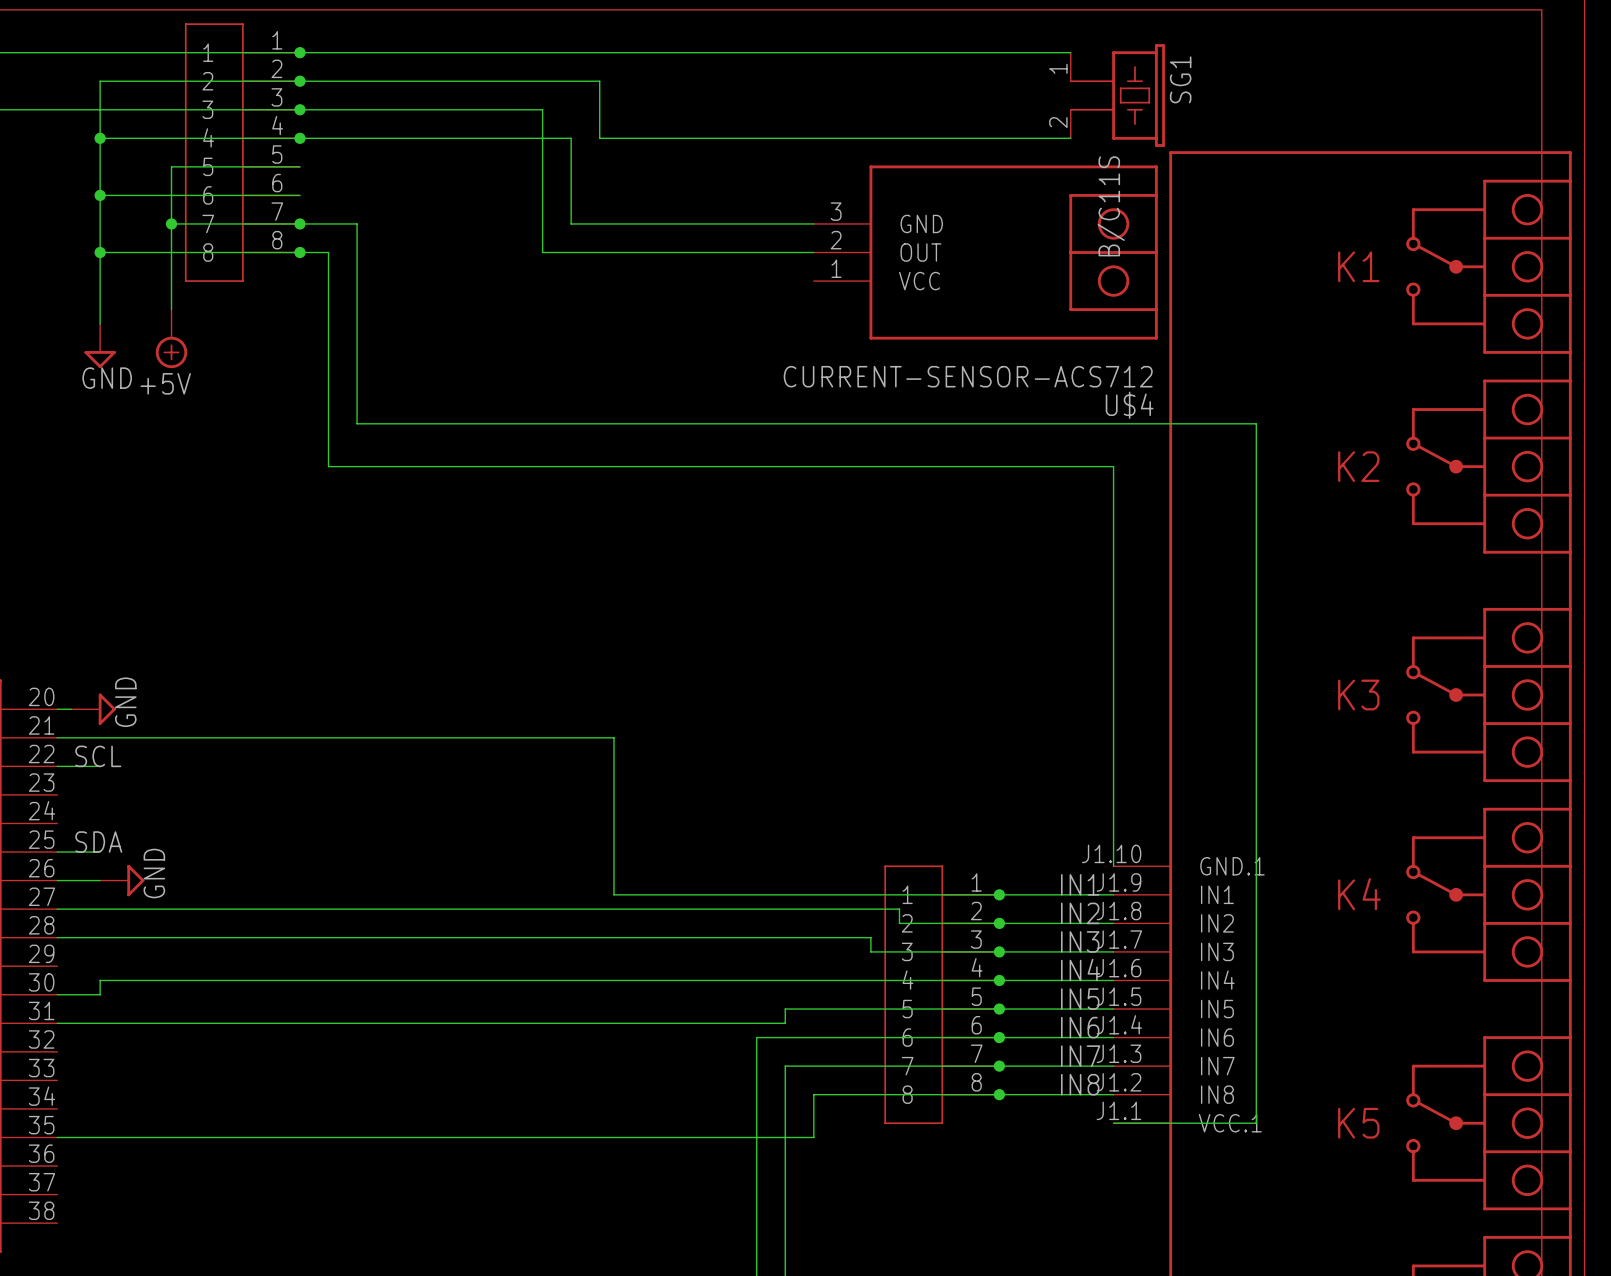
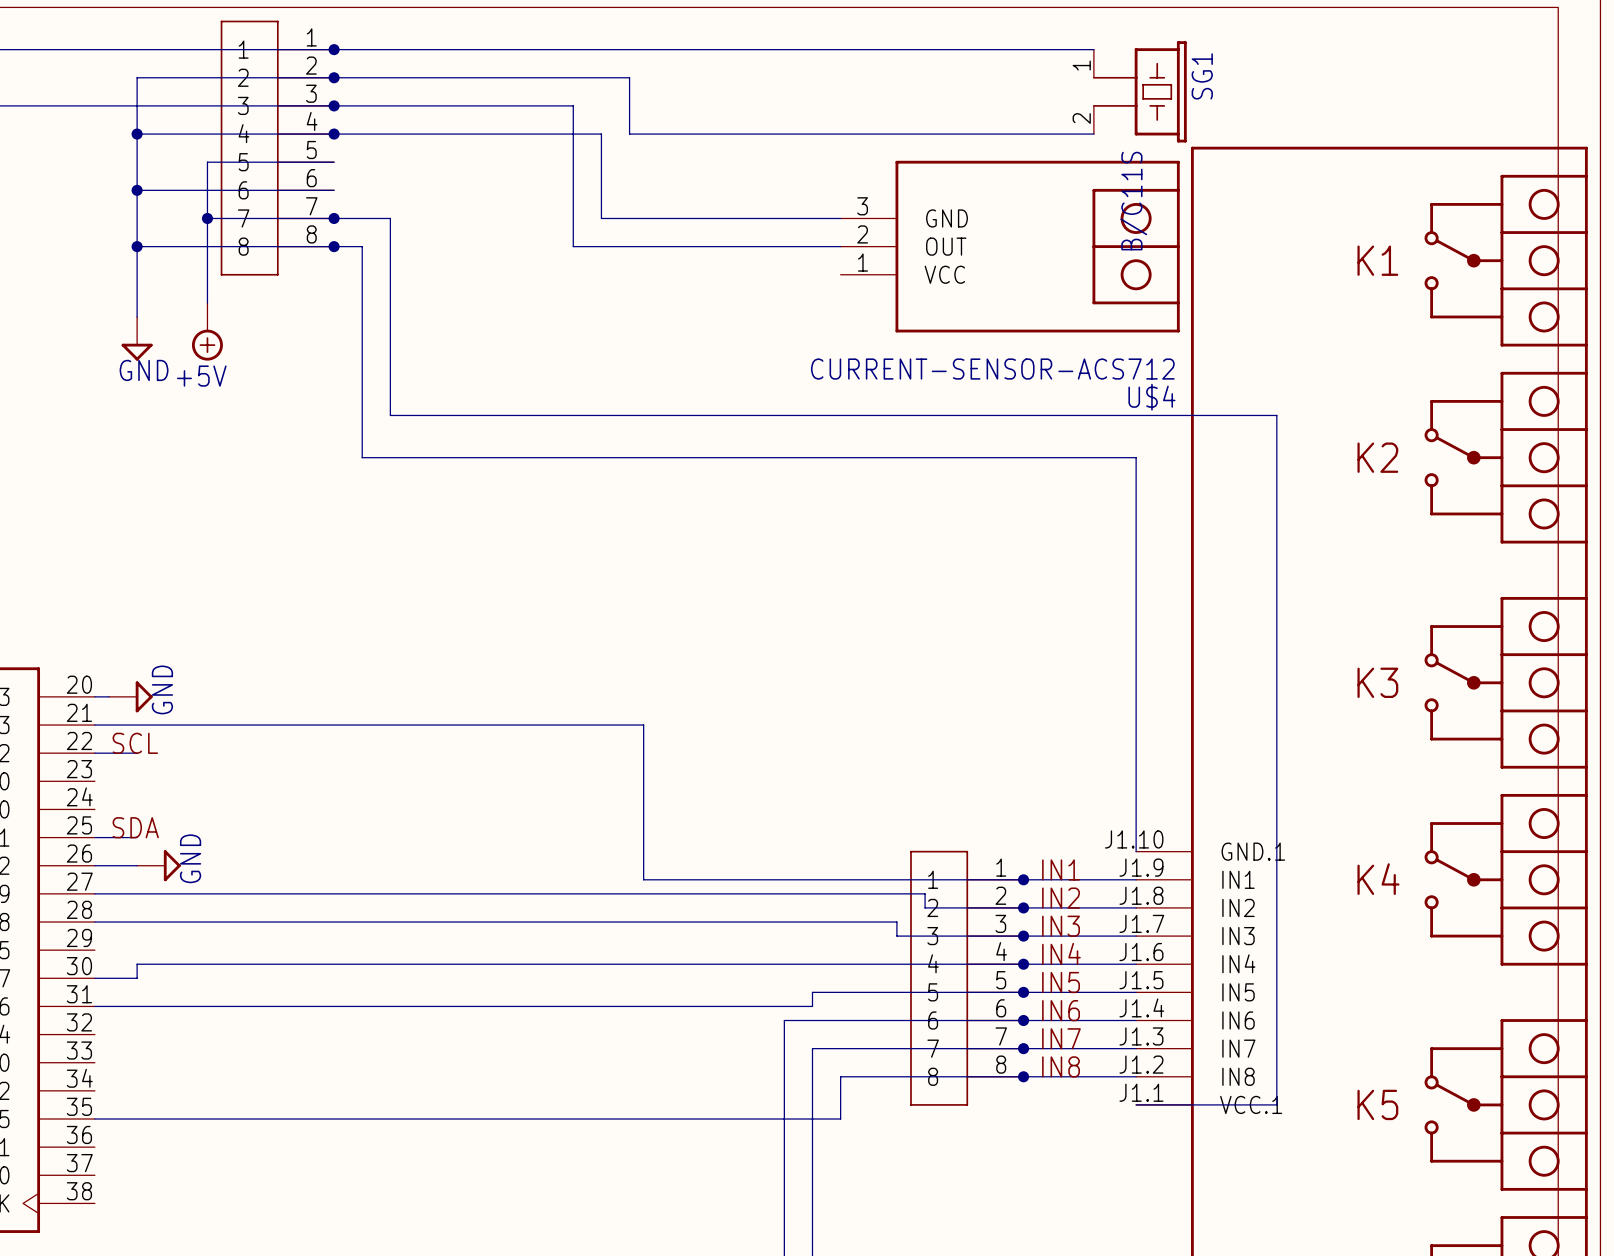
label position: IN1 (1080, 884) -> IN1 (1061, 869)
label position: IN2 (1080, 913) -> IN2 (1061, 898)
label position: IN3 (1080, 941) -> IN3 (1061, 926)
label position: IN4 (1080, 970) -> IN4 (1061, 953)
label position: IN5 (1080, 999) -> IN5 (1061, 982)
label position: IN6 (1080, 1027) -> IN6 (1061, 1010)
label position: IN7 (1080, 1056) -> IN7 (1061, 1038)
label position: IN8 (1080, 1084) -> IN8 (1061, 1066)

